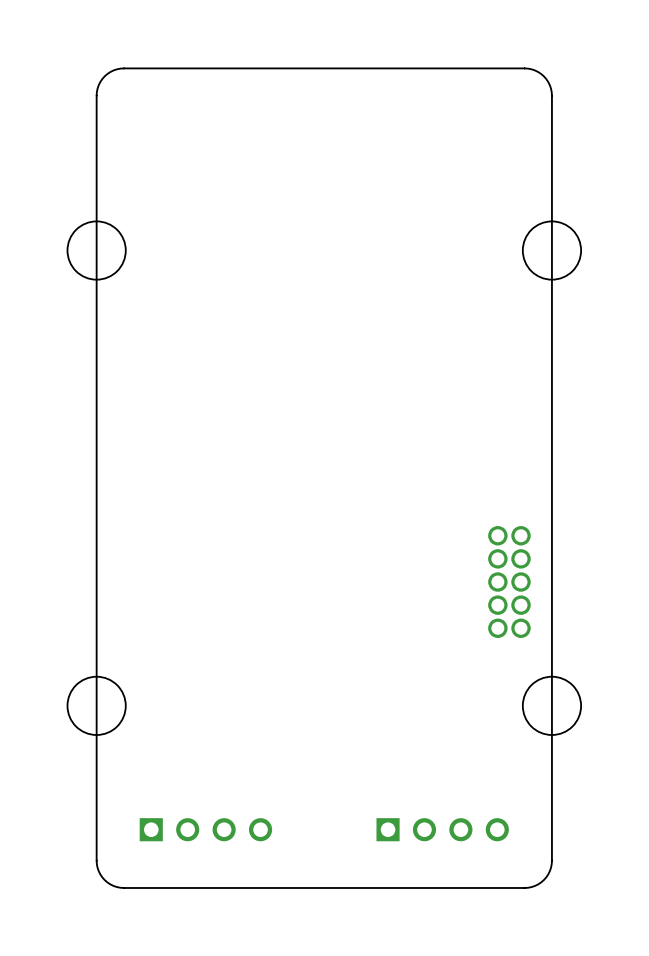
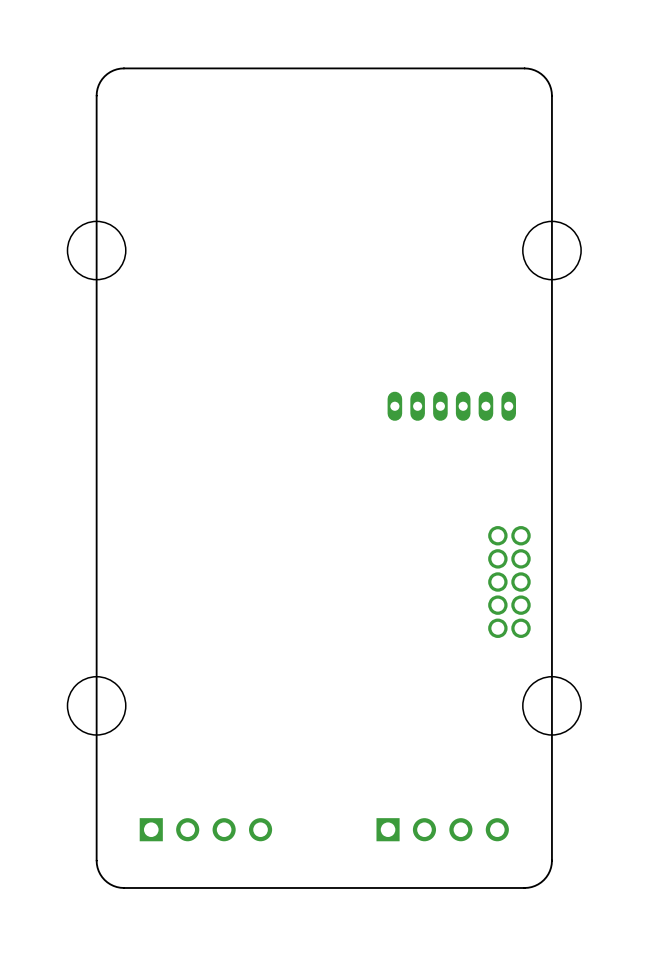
part: none -> (451, 406)

